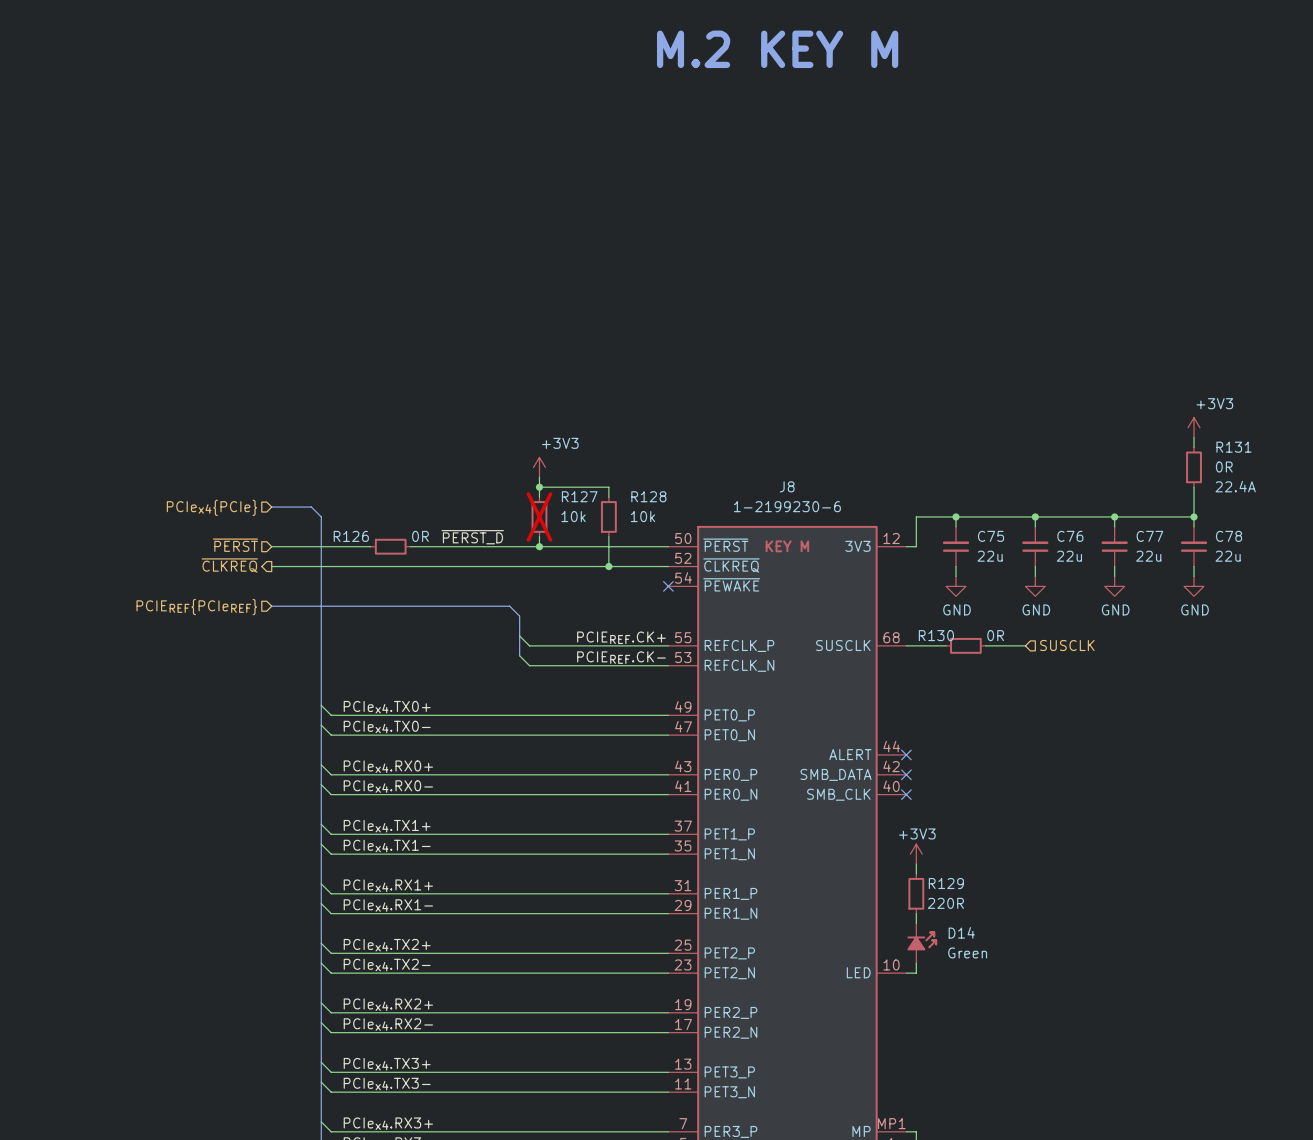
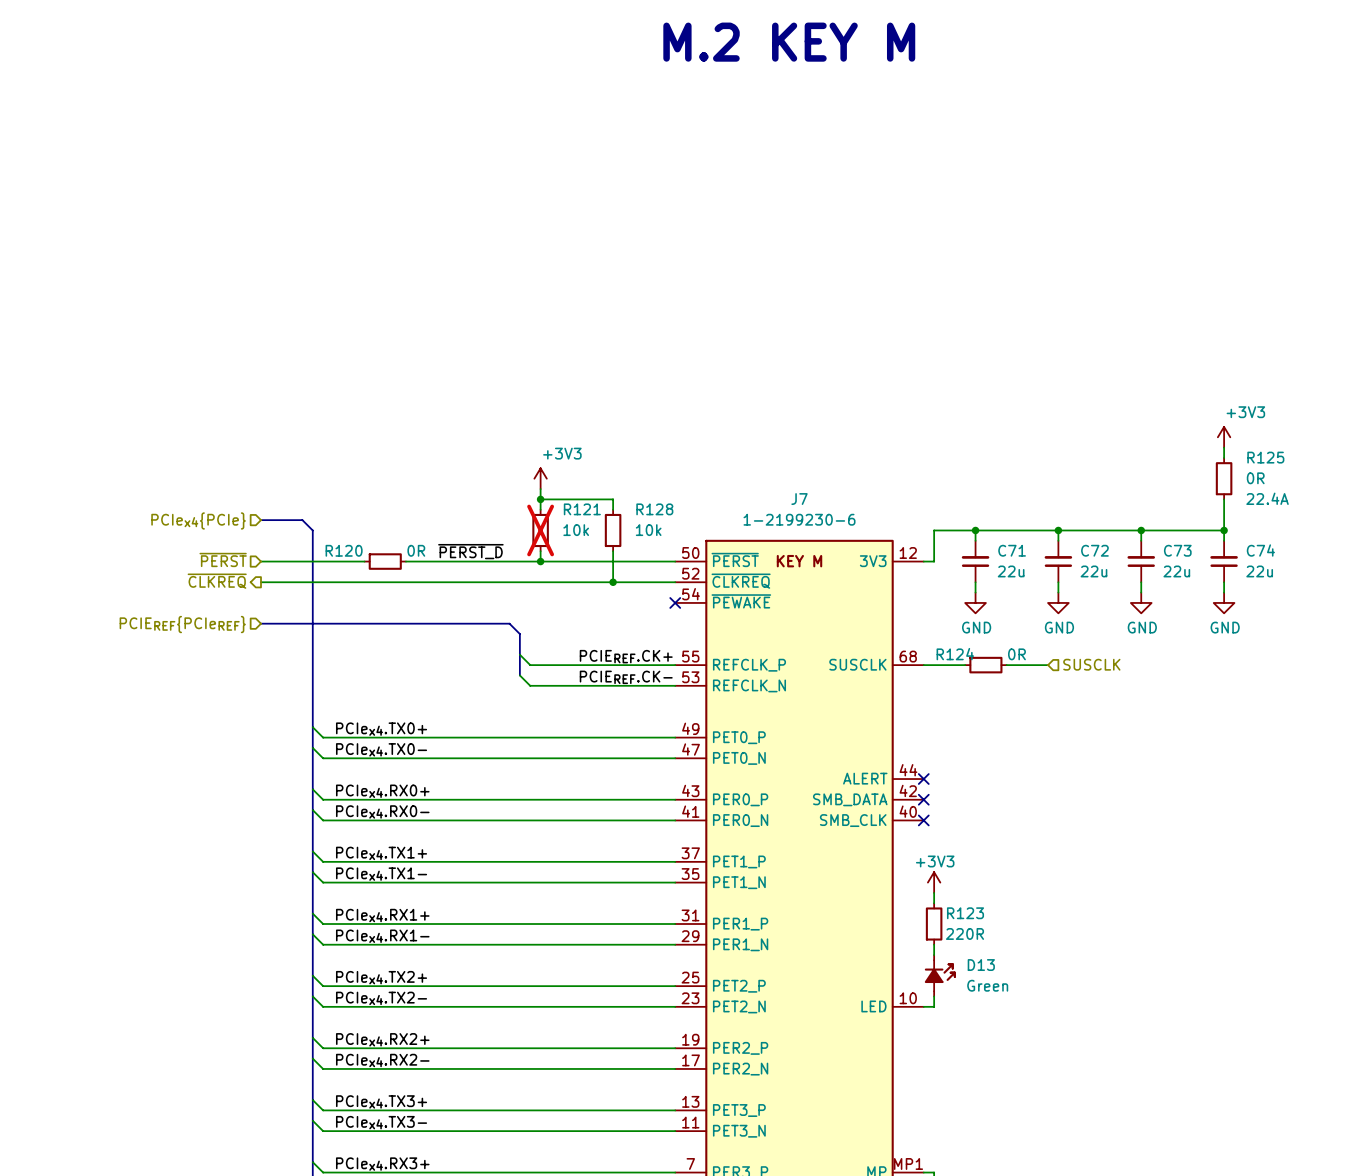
R131 name: R131 (1233, 447) -> R125 (1265, 457)
J8 name: J8 (787, 486) -> J7 (799, 499)
R127 name: R127 (579, 496) -> R121 (582, 509)
R126 name: R126 (351, 536) -> R120 (344, 550)
C75 name: C75 (991, 536) -> C71 (1012, 550)
C76 name: C76 (1070, 536) -> C72 (1094, 550)
C77 name: C77 (1149, 536) -> C73 (1177, 550)
C78 name: C78 (1229, 536) -> C74 (1260, 550)
R130 name: R130 (936, 635) -> R124 (955, 654)
R129 name: R129 (946, 883) -> R123 (965, 913)
D14 name: D14 (961, 932) -> D13 (981, 965)

